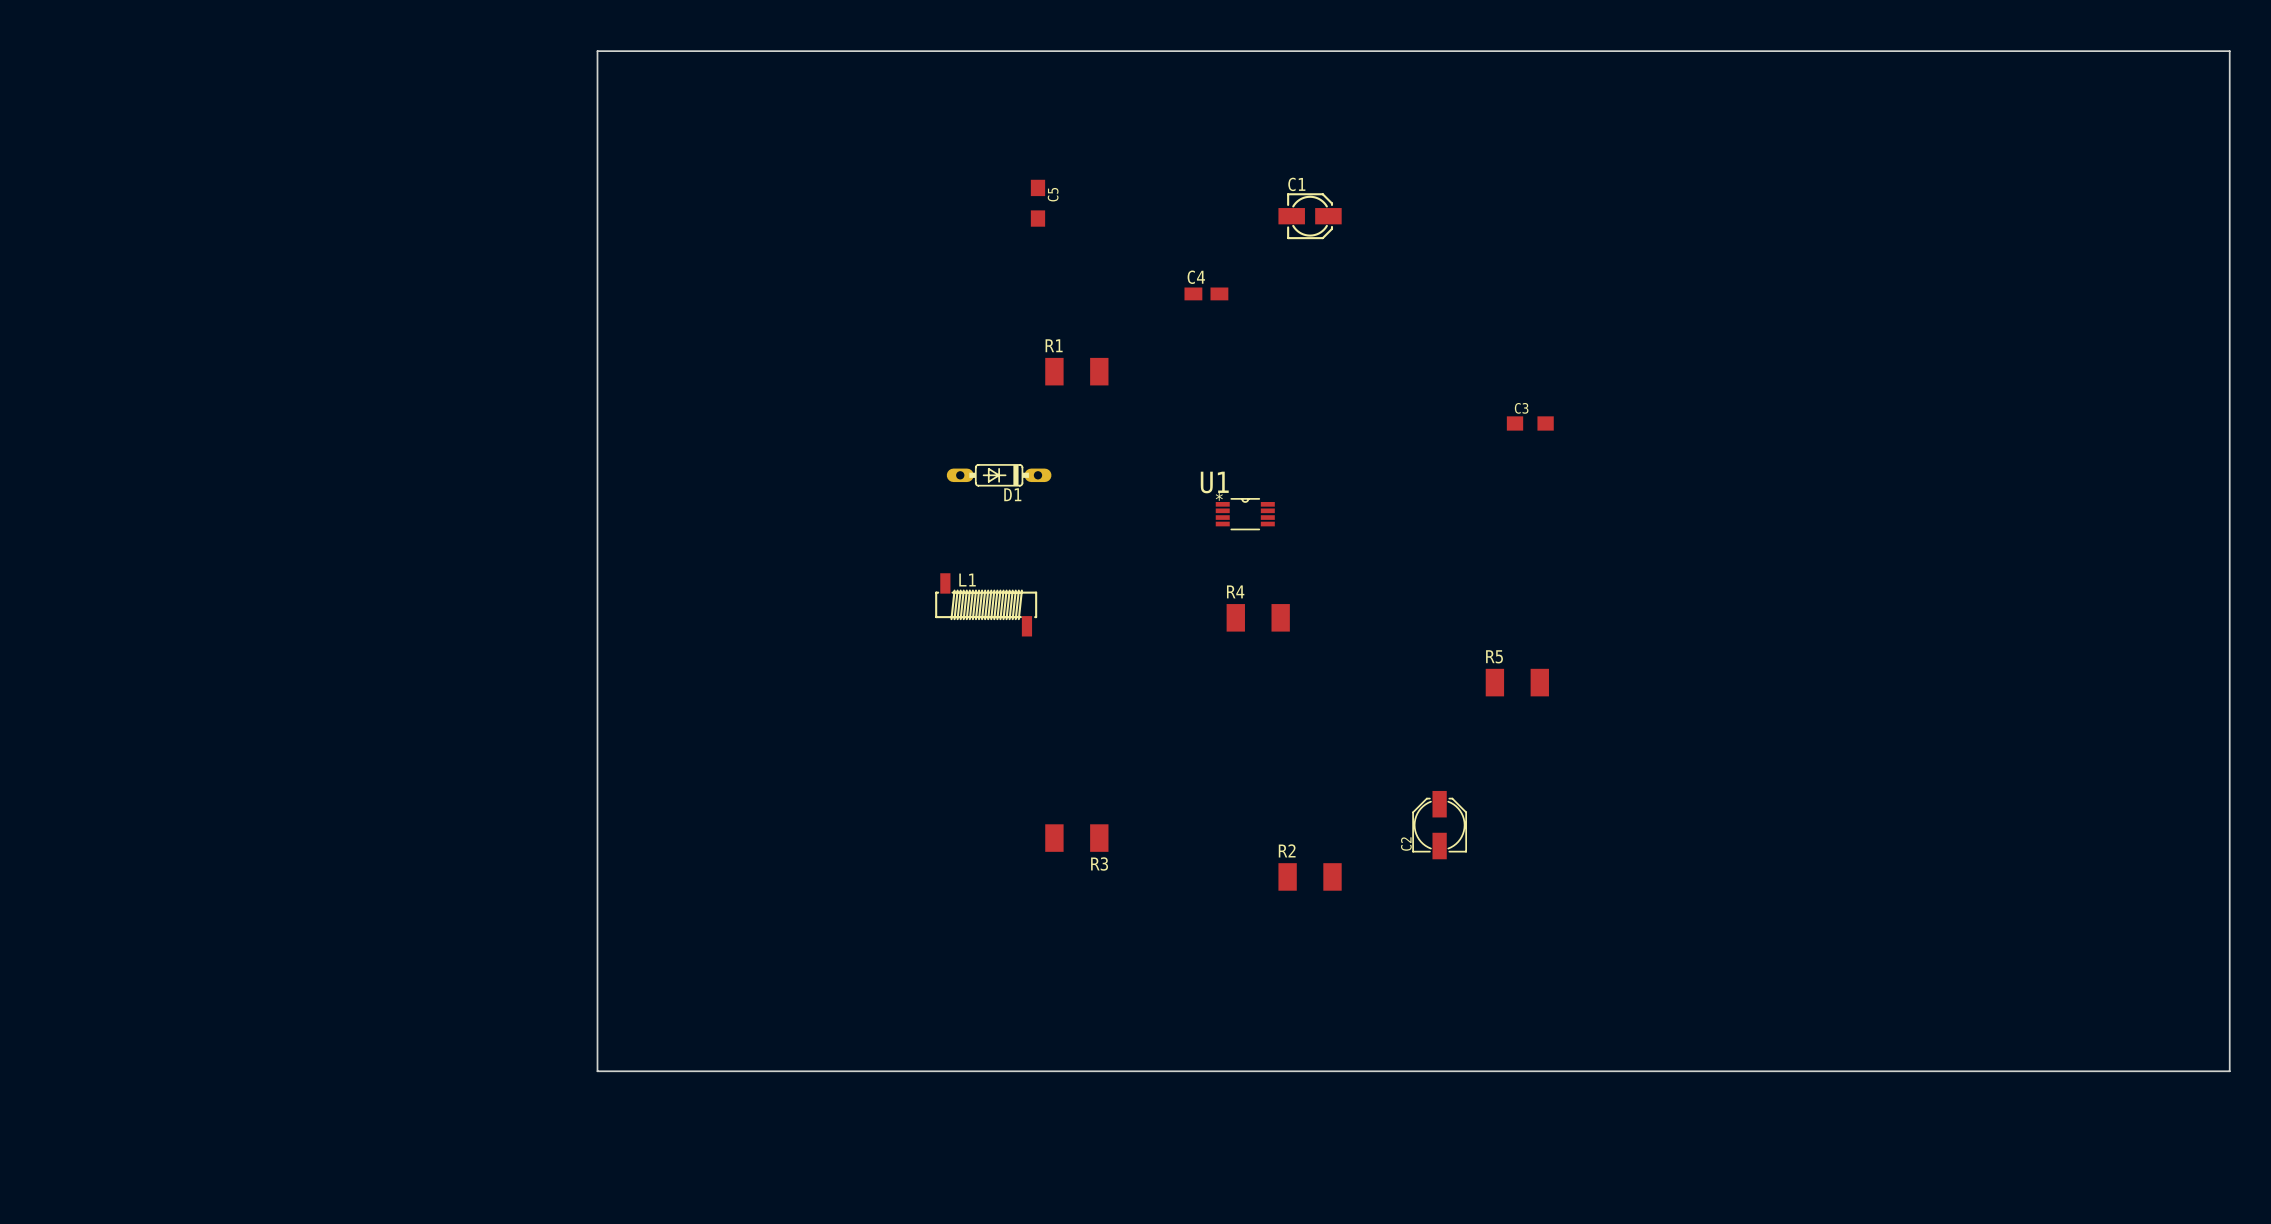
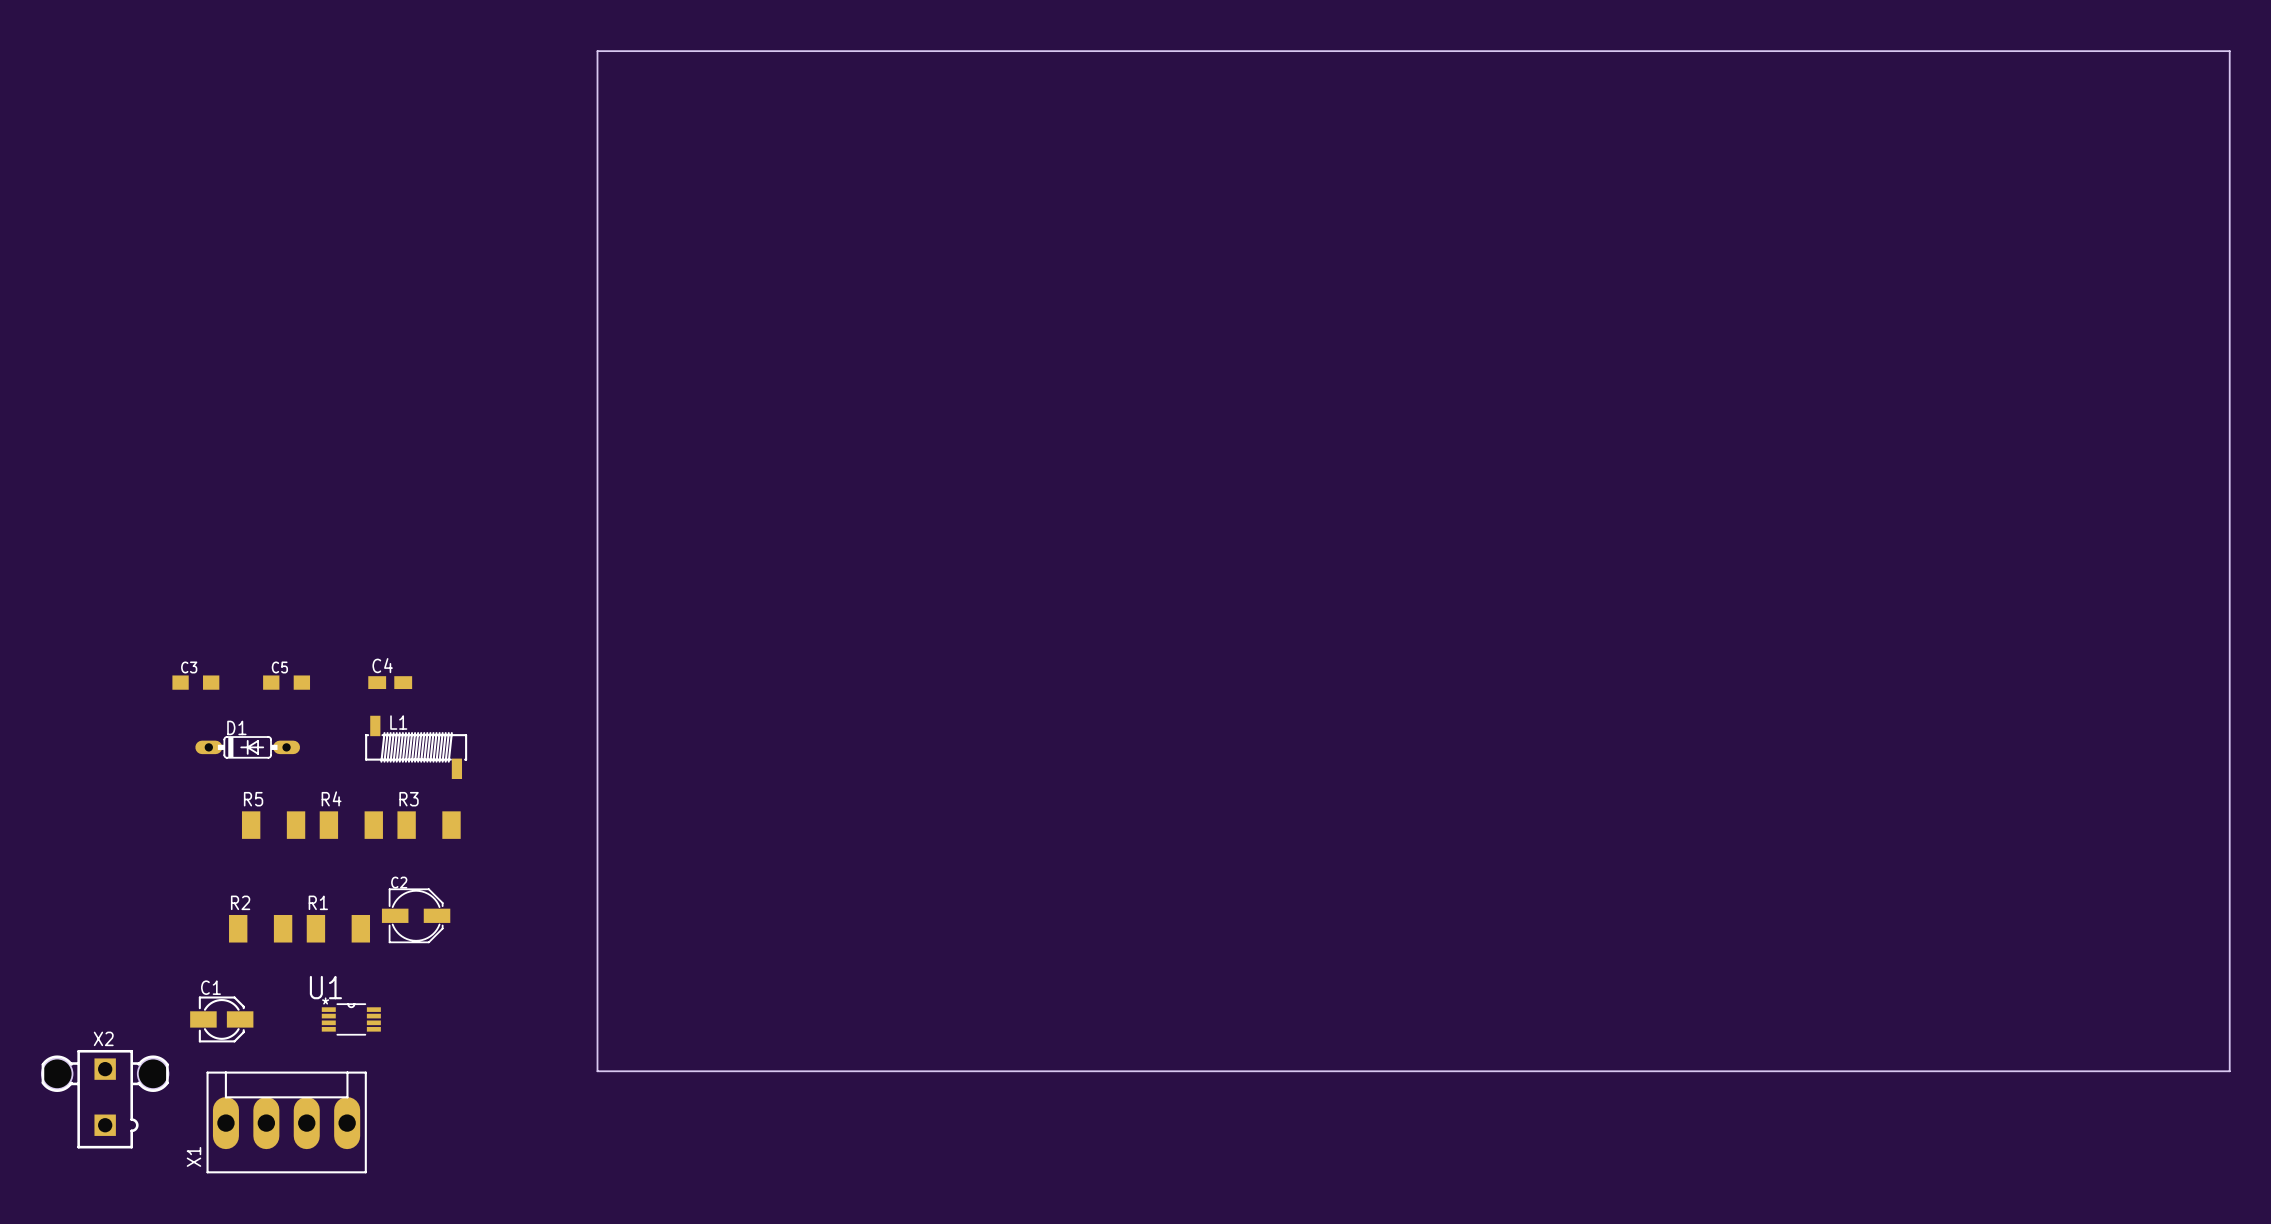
C5 name position: C5 (1053, 194) -> C5 (279, 667)
C5 rotation: 0° (1037, 203) -> 90° clockwise (286, 682)
C5 position: (1037, 203) -> (286, 682)
C1 position: (1310, 216) -> (221, 1019)
C4 position: (1206, 293) -> (390, 682)
R1 position: (1076, 371) -> (338, 928)
C3 position: (1530, 423) -> (195, 682)
D1 rotation: 0° (999, 475) -> 180° (247, 747)
D1 position: (999, 475) -> (247, 747)
U1 position: (1245, 514) -> (351, 1019)
L1 position: (986, 604) -> (416, 747)
R4 position: (1258, 617) -> (351, 825)
R5 position: (1517, 682) -> (273, 825)
C2 rotation: 0° (1439, 825) -> 90° clockwise (416, 915)
C2 position: (1439, 825) -> (416, 915)
R3 position: (1076, 838) -> (429, 825)
R3 name position: R3 (1099, 863) -> R3 (409, 799)
R2 position: (1310, 876) -> (260, 928)
X2: none -> (105, 1099)
X1: none -> (286, 1122)

